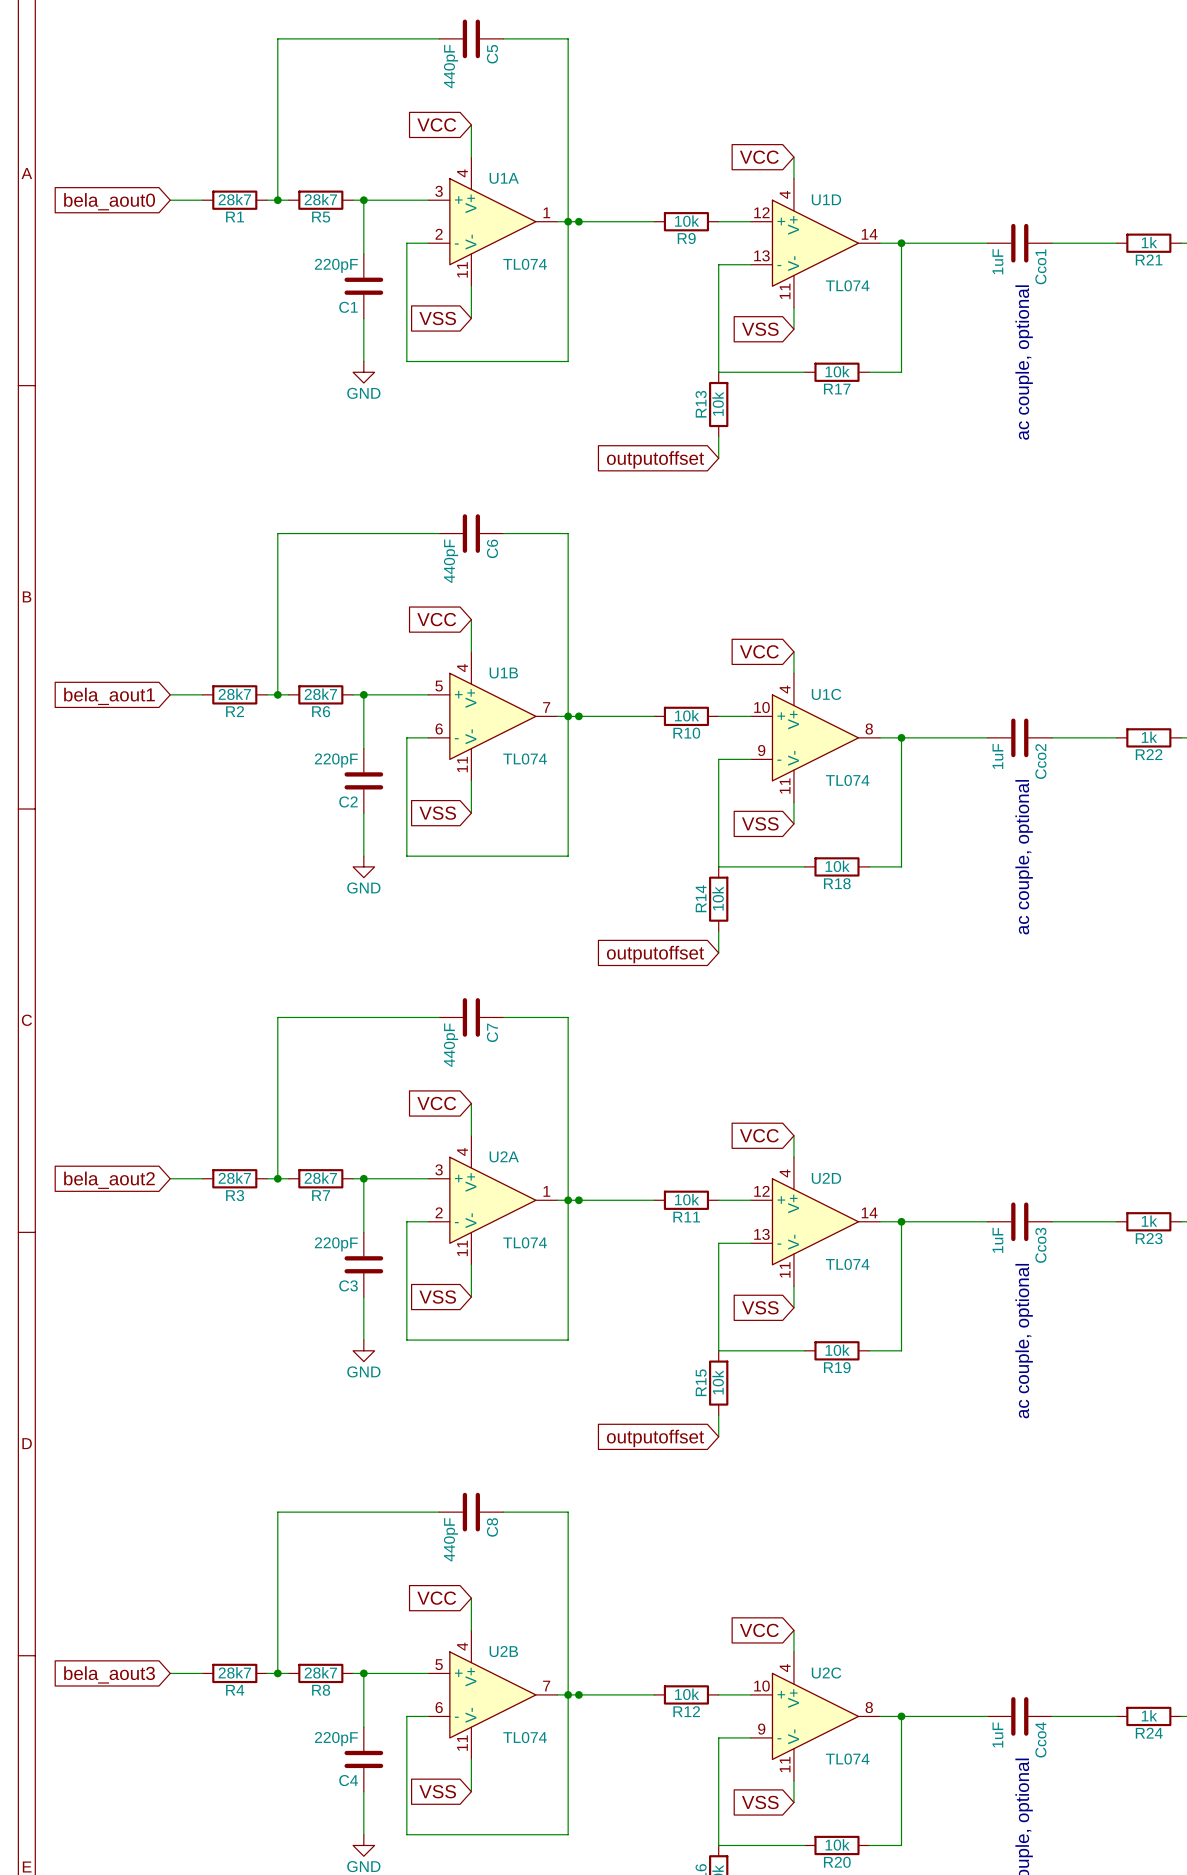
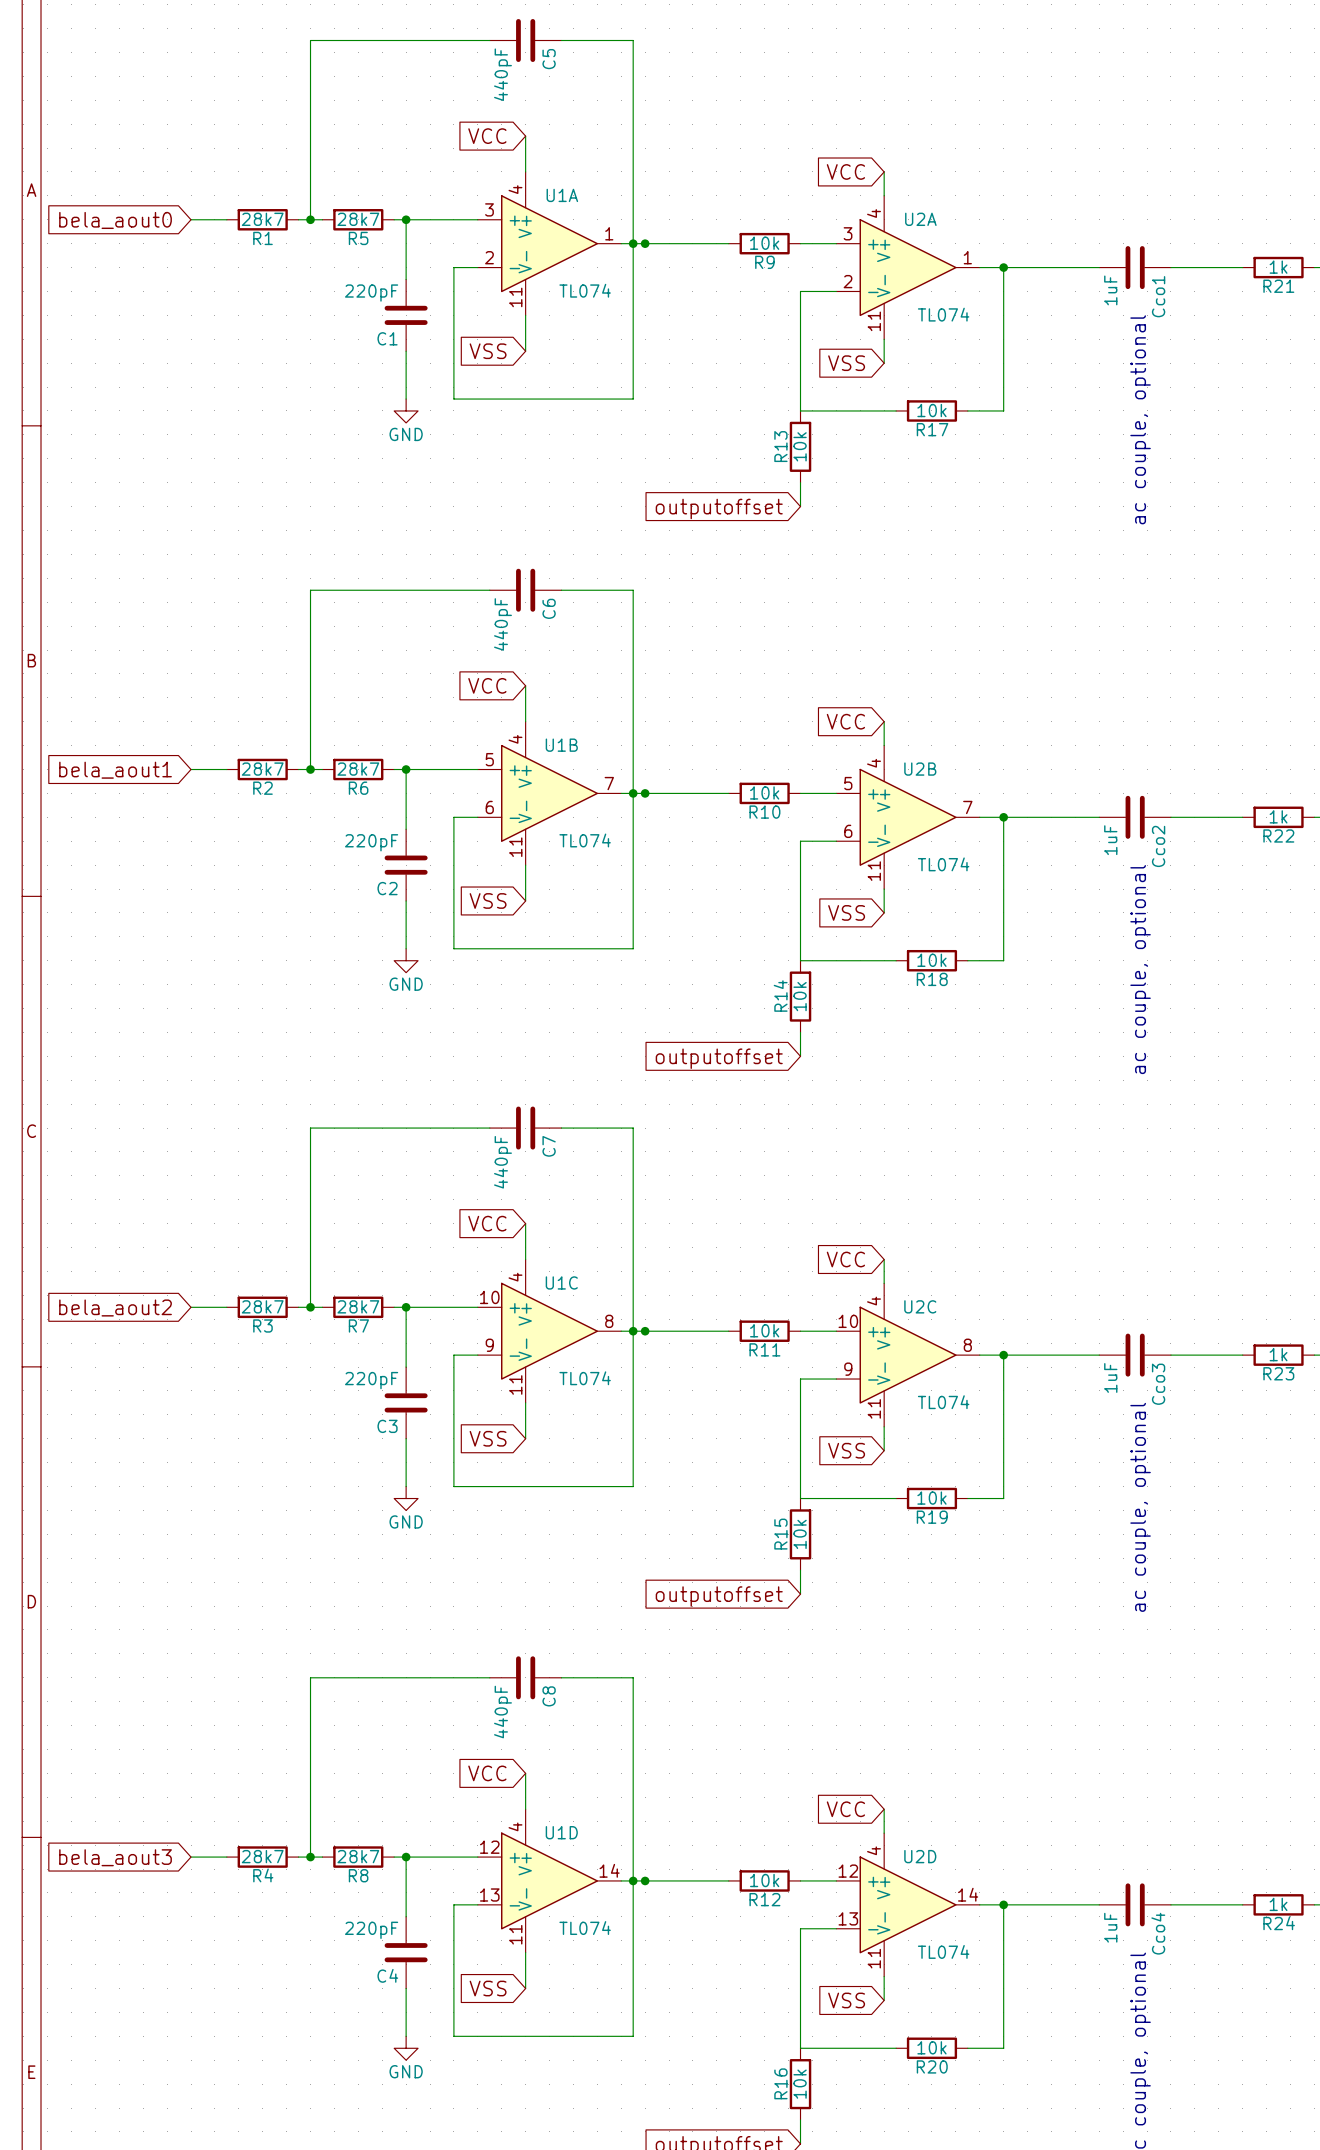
U1D position: (815, 243) -> (549, 1880)
U1C position: (815, 737) -> (549, 1331)
U2A position: (492, 1200) -> (908, 267)
U2D position: (815, 1221) -> (908, 1904)
U2B position: (492, 1694) -> (908, 817)
U2C position: (815, 1716) -> (908, 1355)

